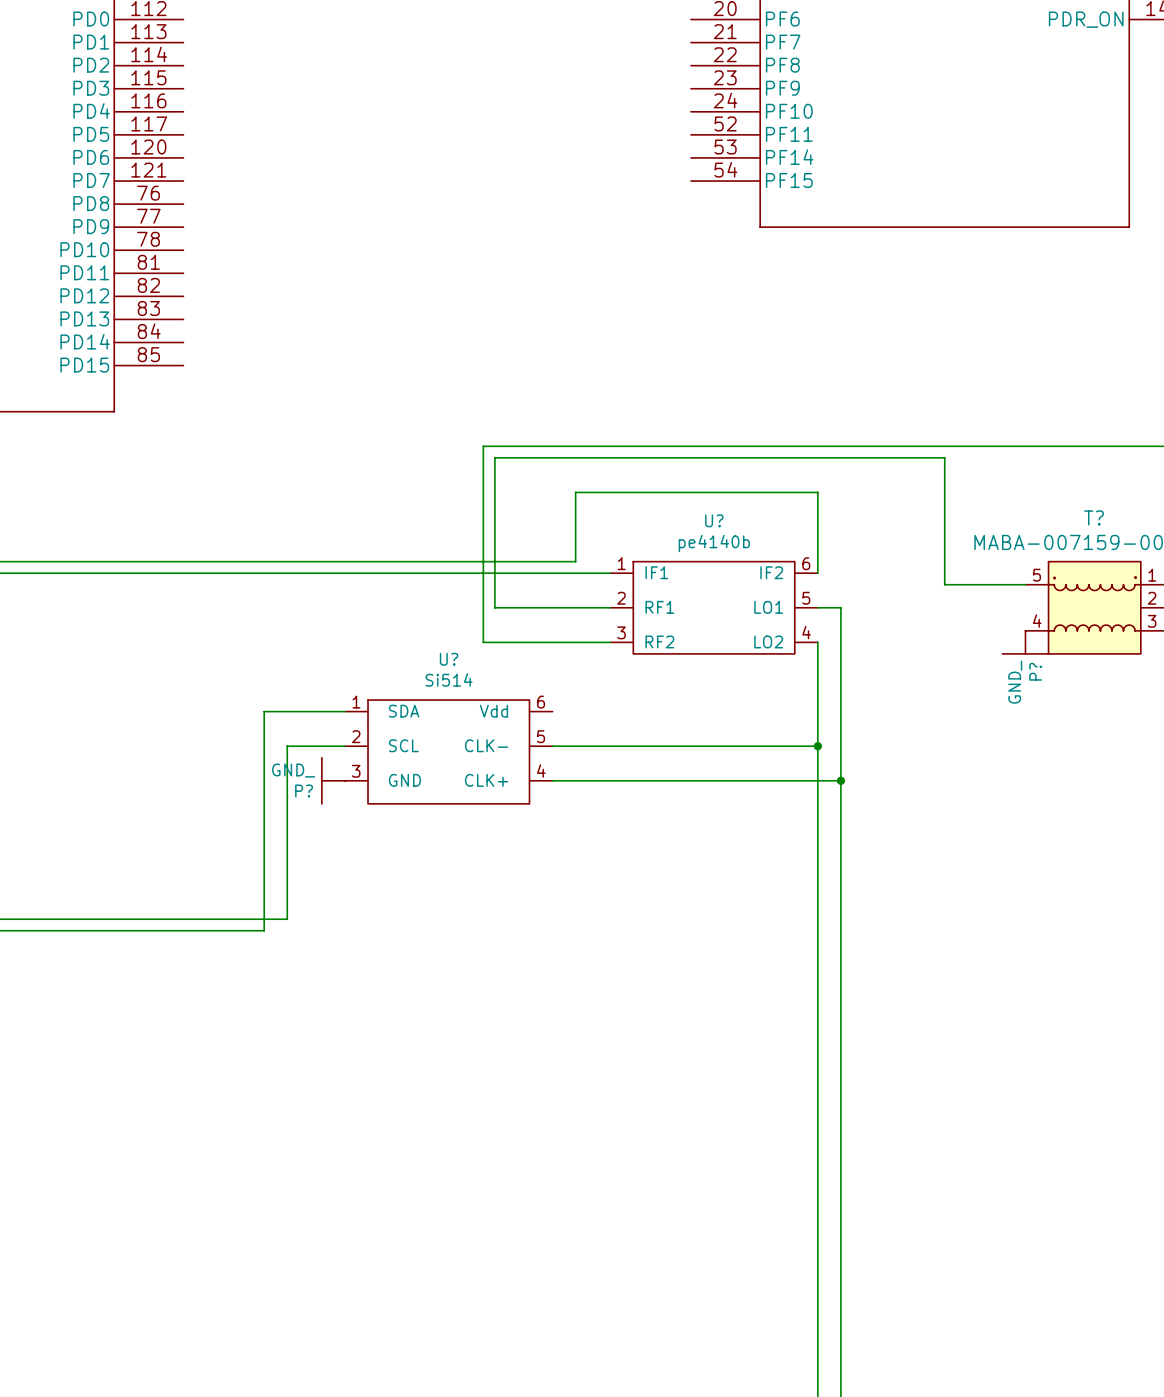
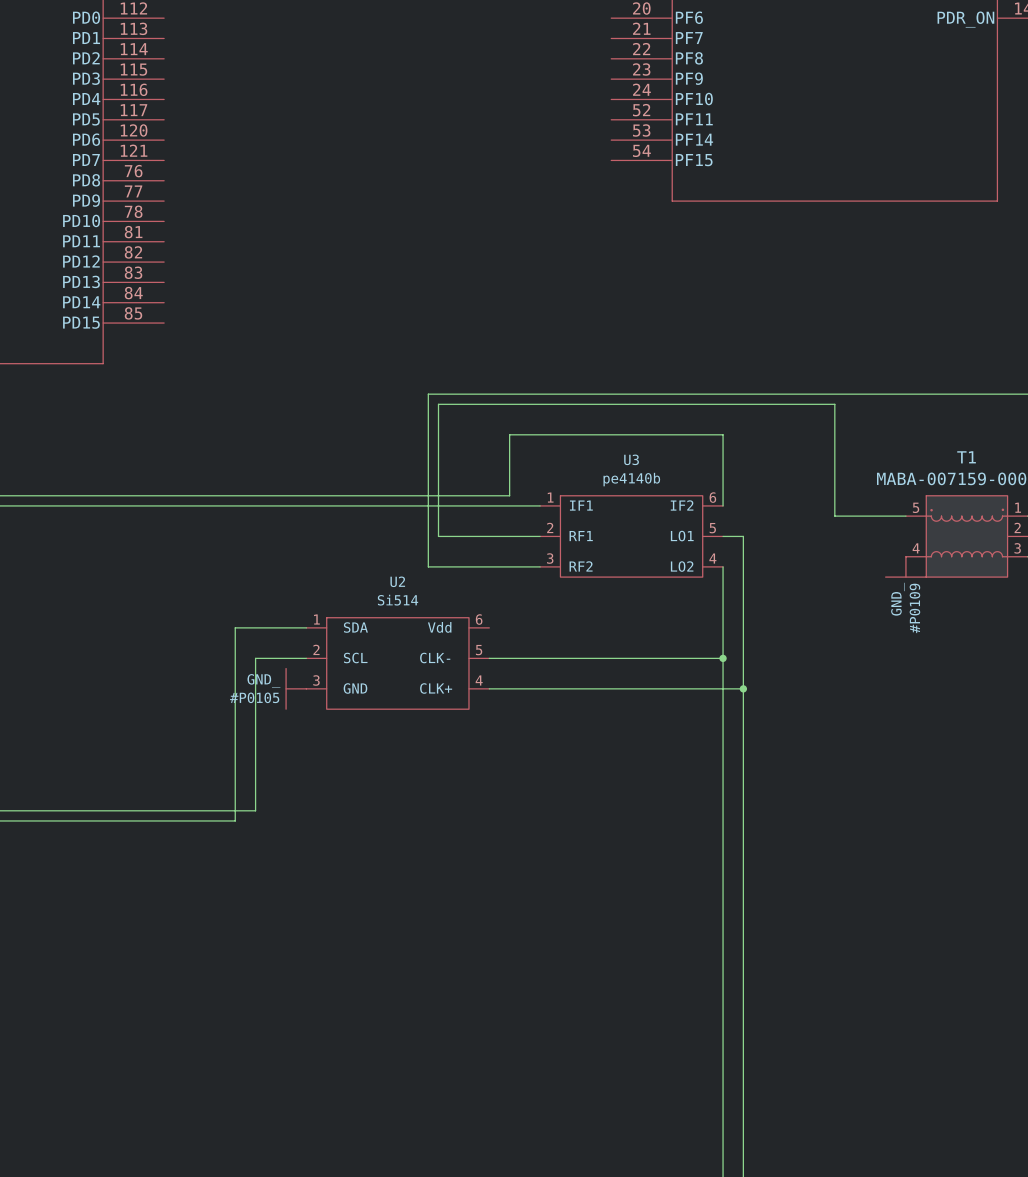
T? name: T? (1094, 517) -> T1 (966, 457)
U? name: U? (714, 520) -> U3 (631, 459)
U? name: U? (449, 659) -> U2 (397, 581)
P? name: P? (1035, 671) -> #P0109 (914, 608)
P? name: P? (304, 790) -> #P0105 (254, 697)

